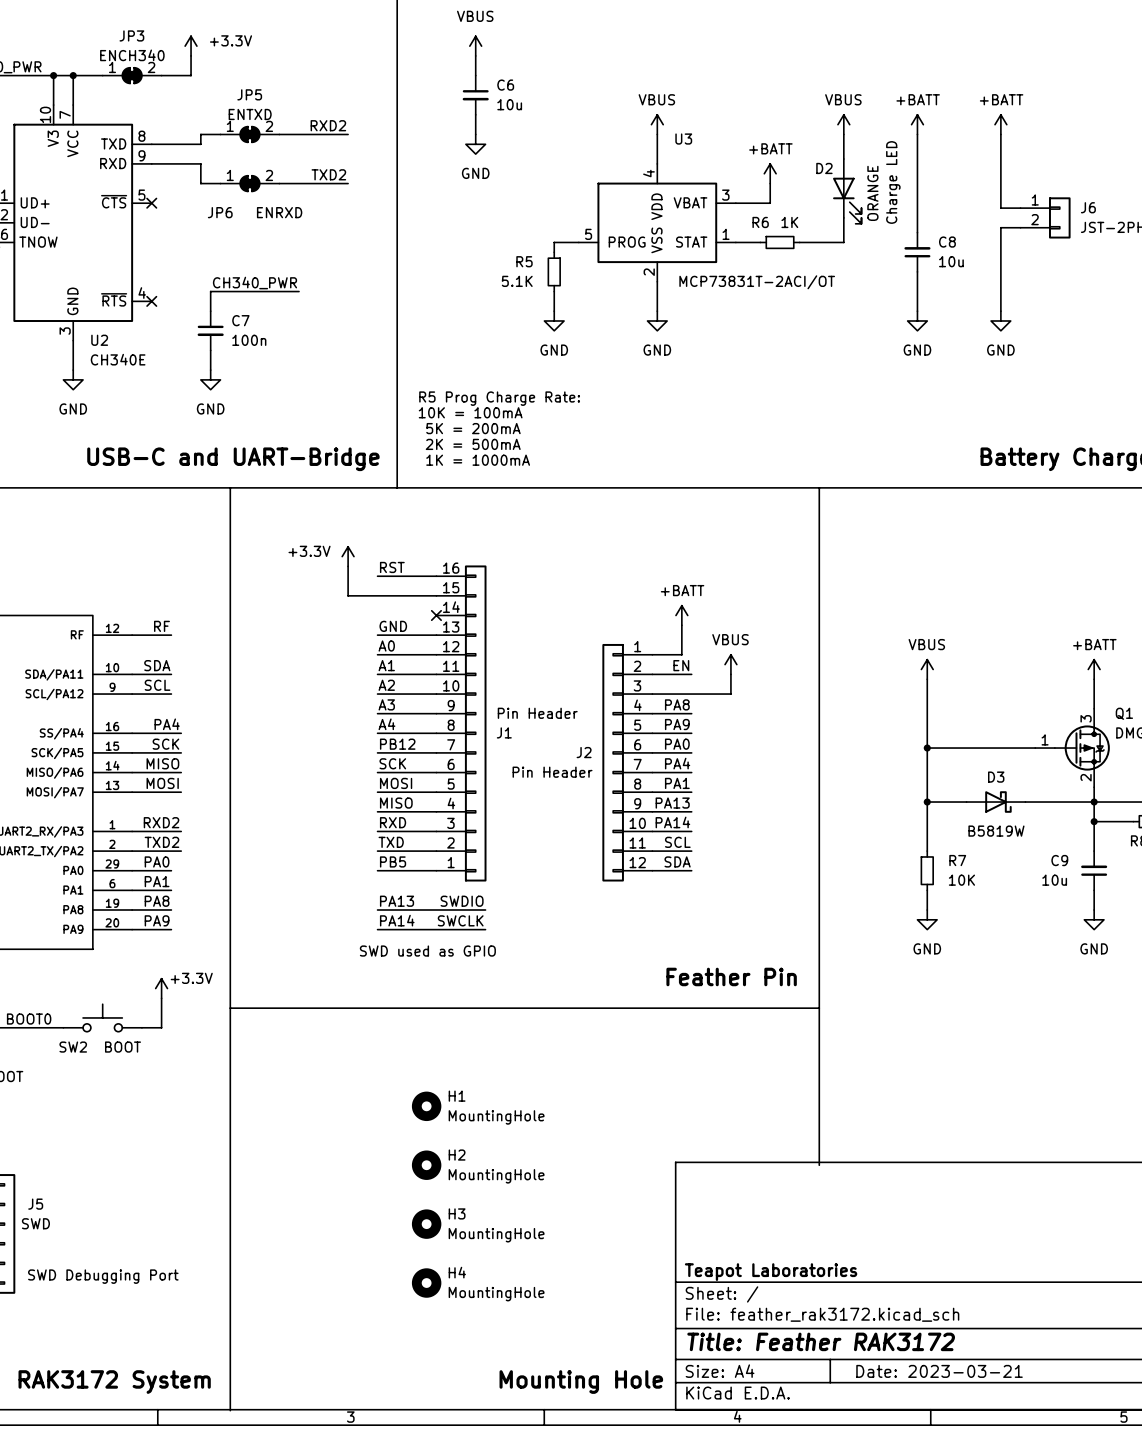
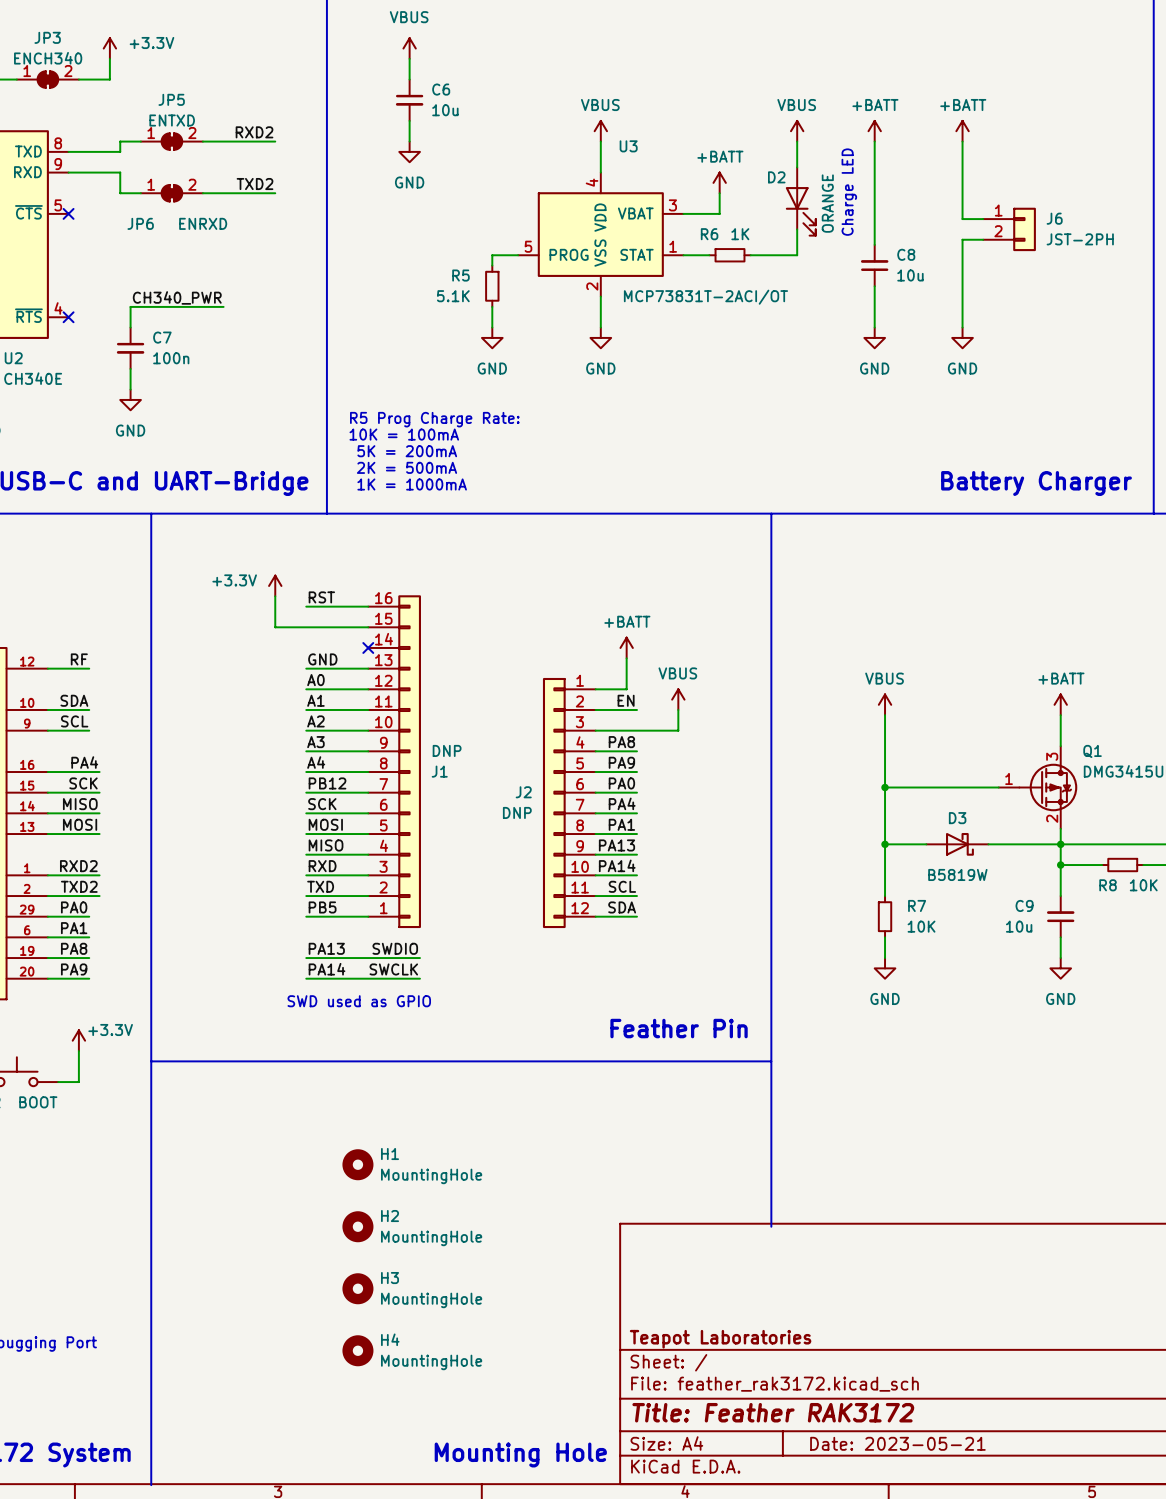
J1 value: Pin Header (537, 713) -> DNP (447, 750)
J2 value: Pin Header (552, 772) -> DNP (517, 812)
title block: Date: 2023-03-21 (939, 1371) -> Date: 2023-05-21 (897, 1443)

